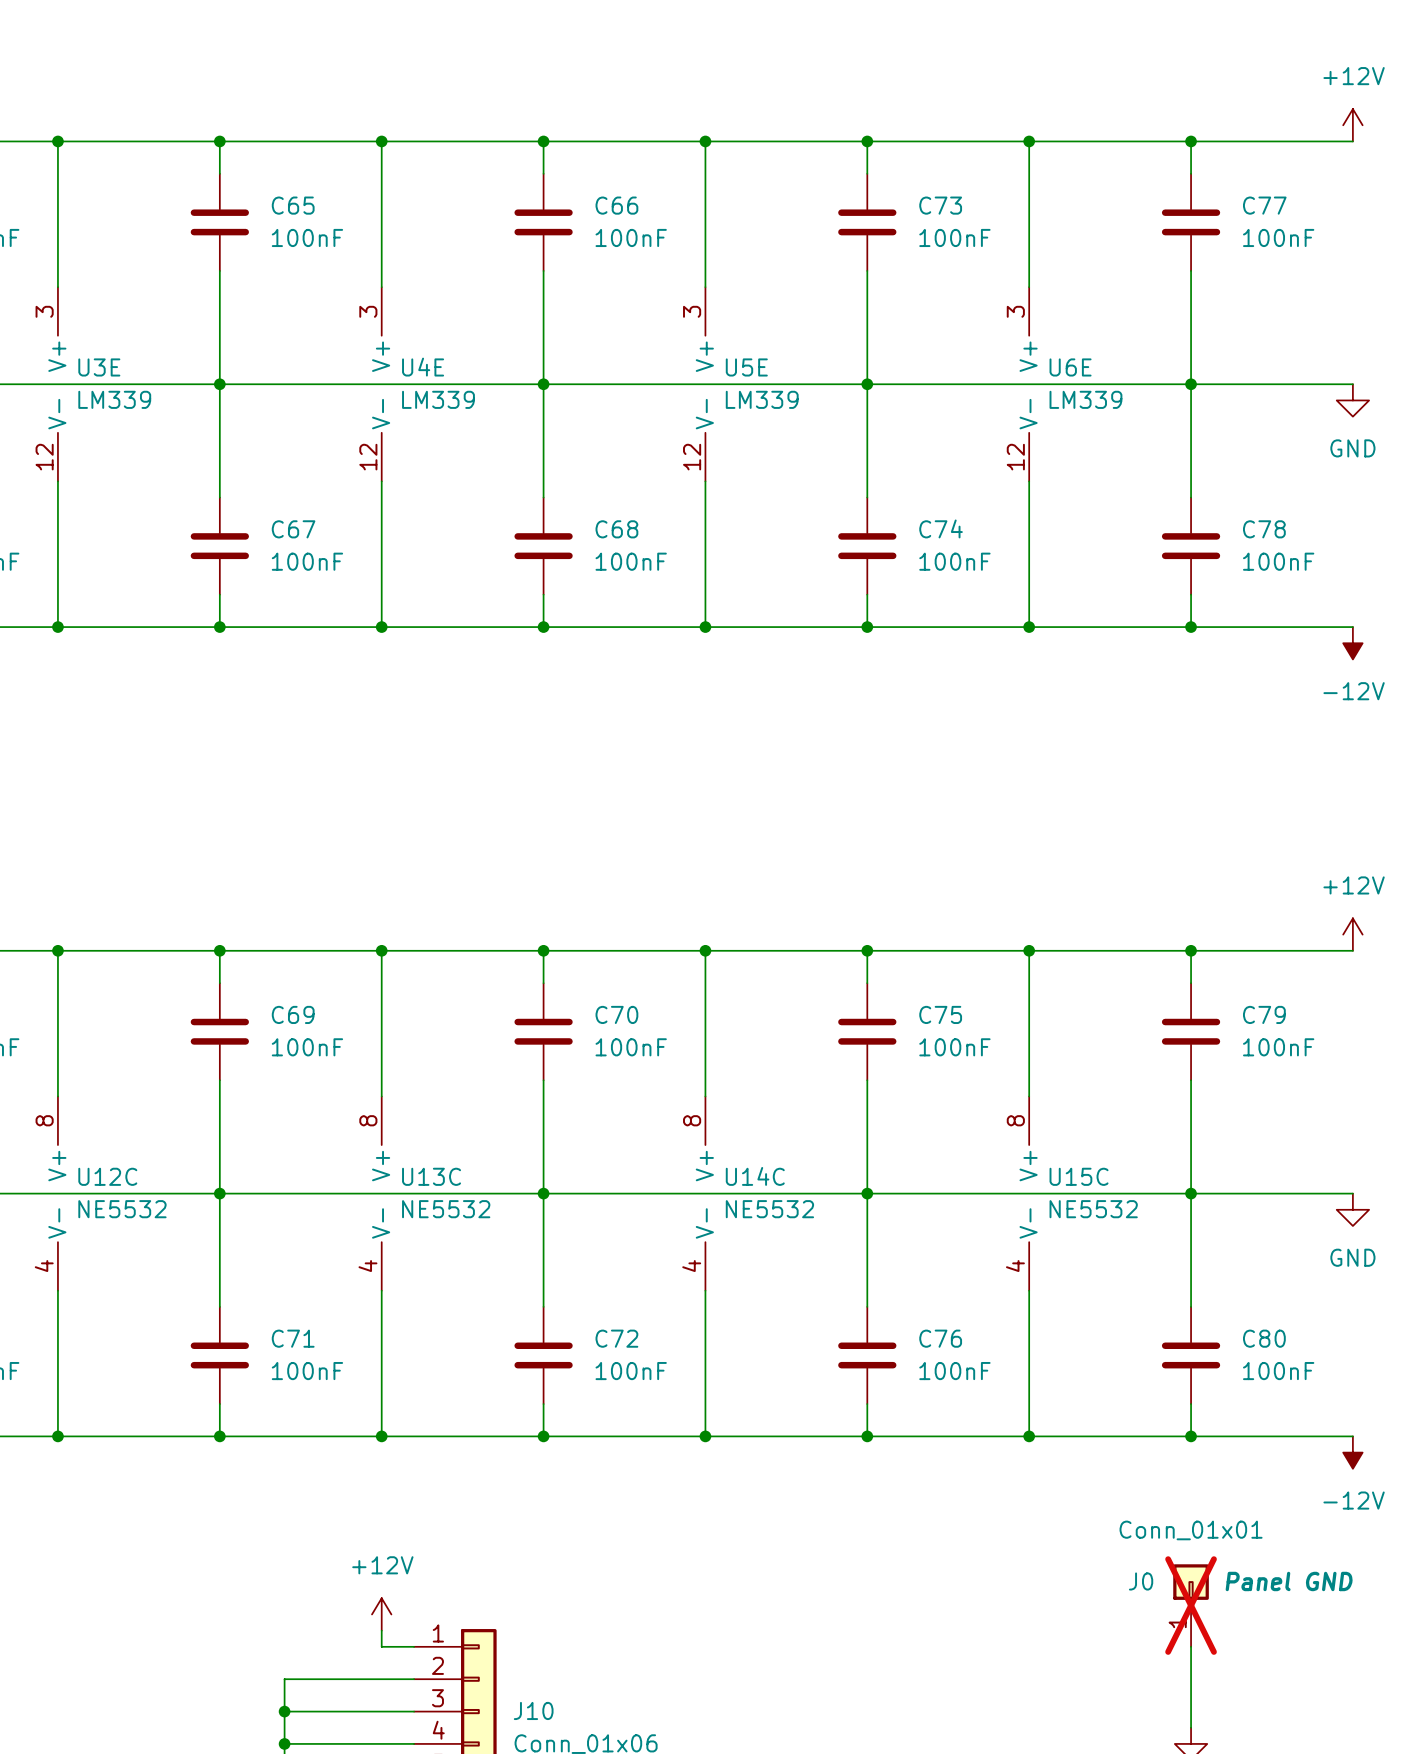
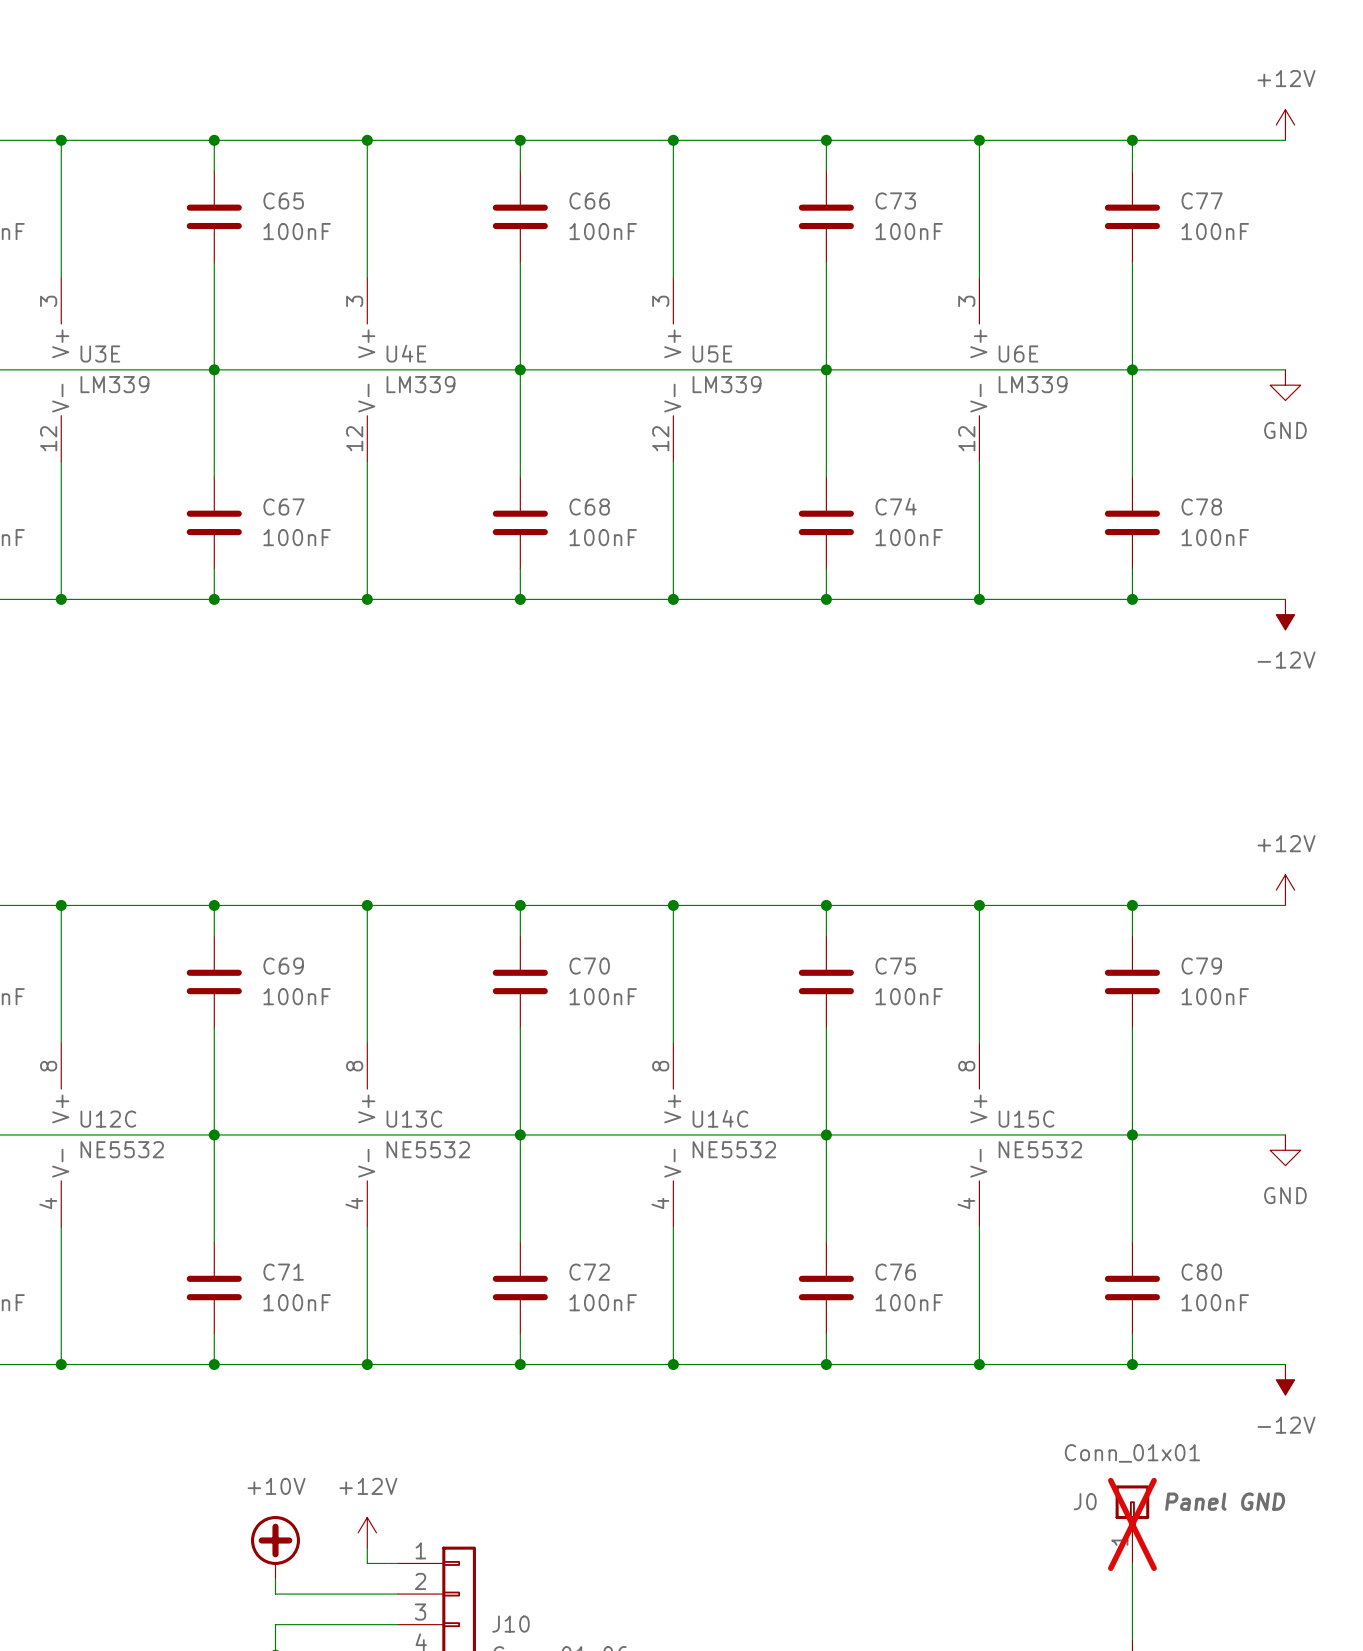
power symbol: none -> +10V (275, 1547)
wire: (284, 1679) (284, 1711) -> (275, 1594) (275, 1578)
junction: (284, 1711) -> none

